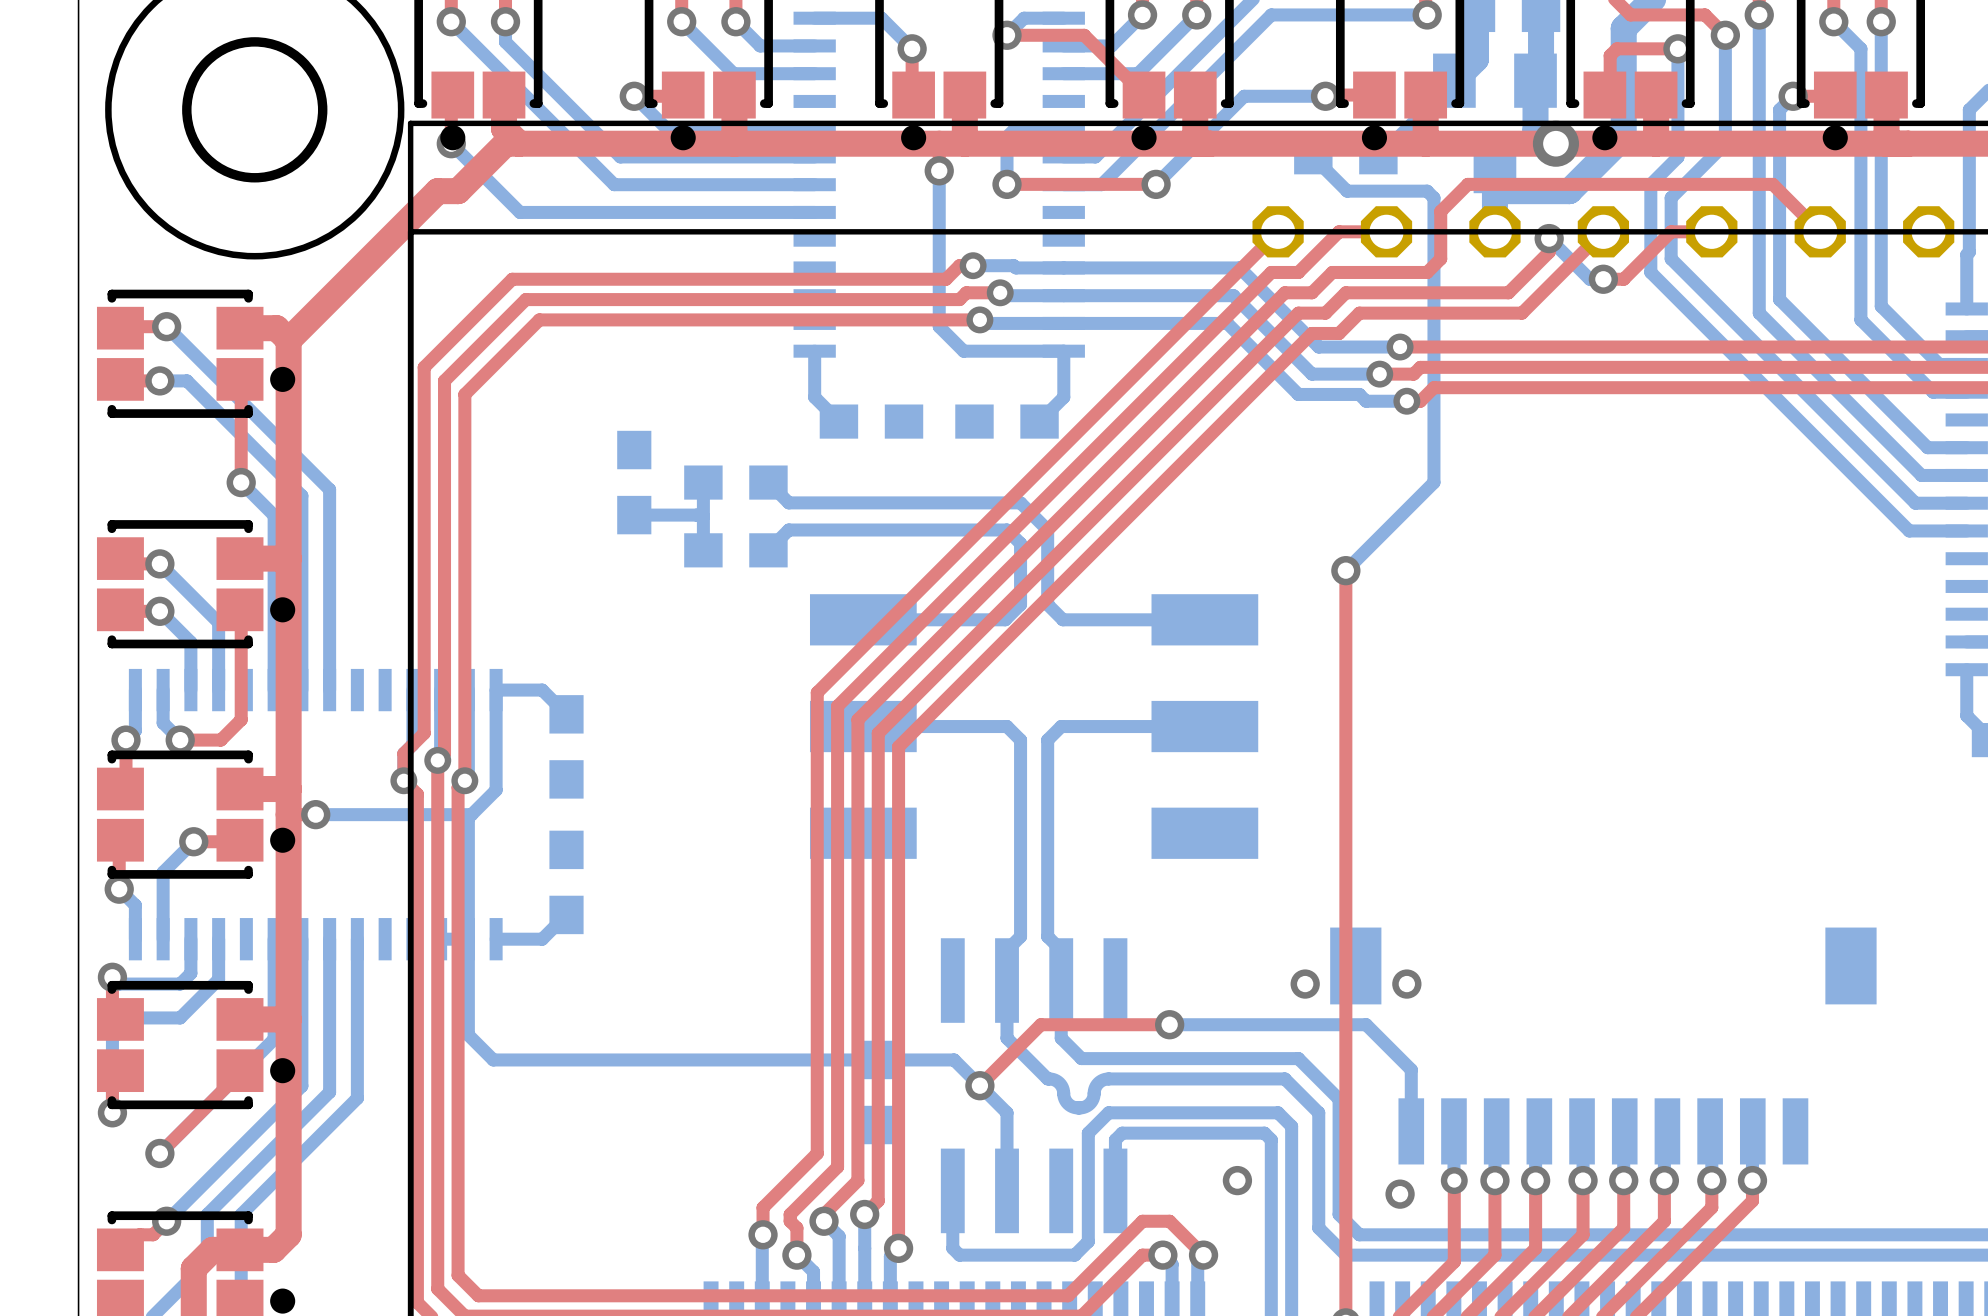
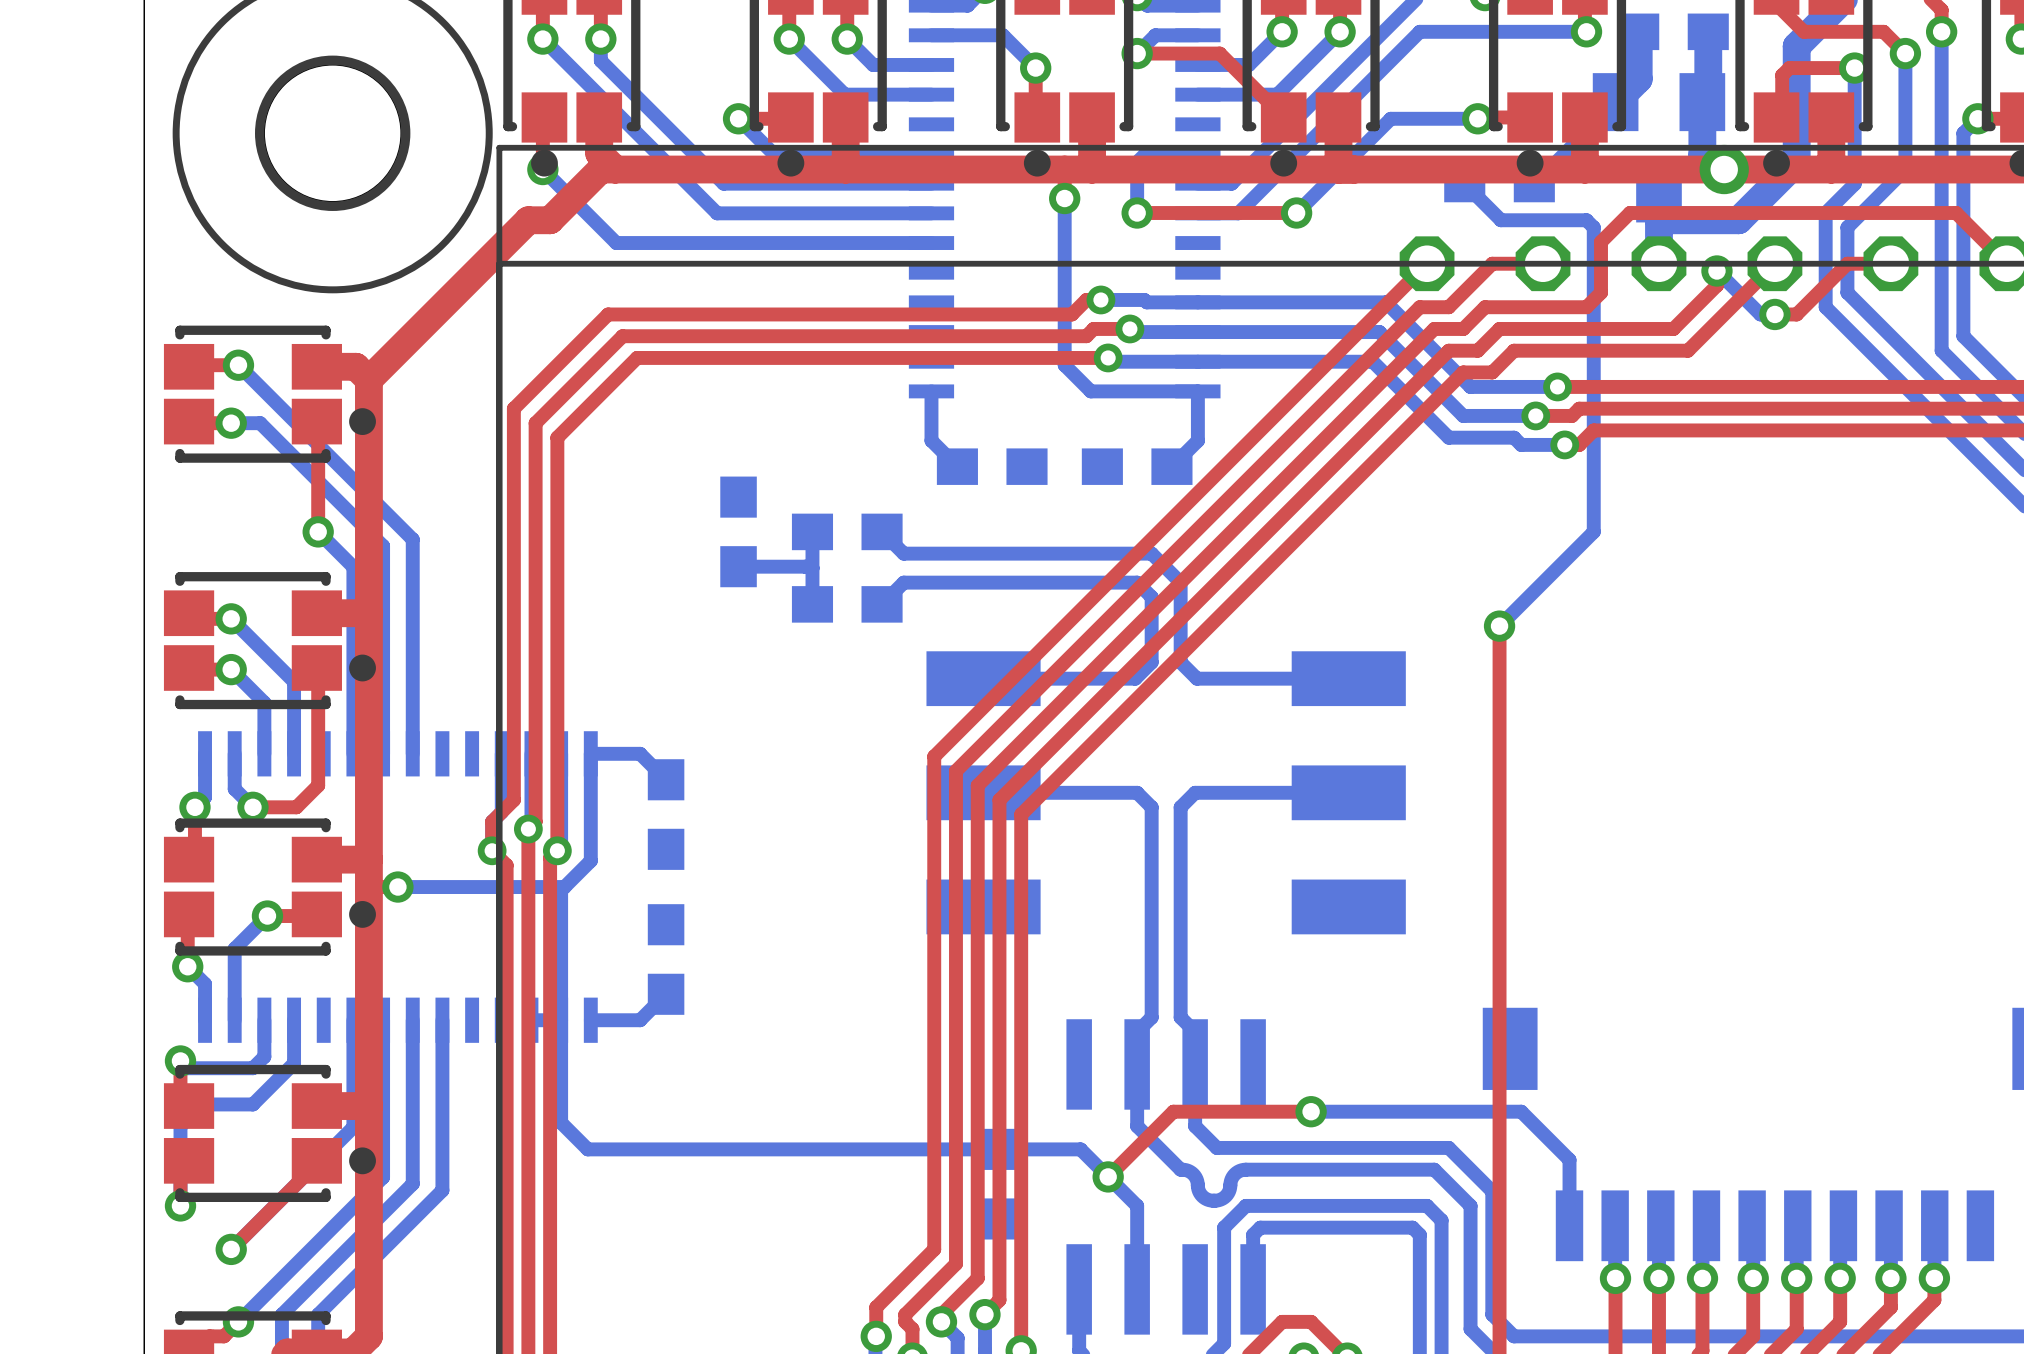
via: (1305, 984) -> none
via: (1406, 984) -> none
via: (1237, 1180) -> none
via: (1454, 1180) -> none
via position: (1400, 1194) -> (1615, 1278)

